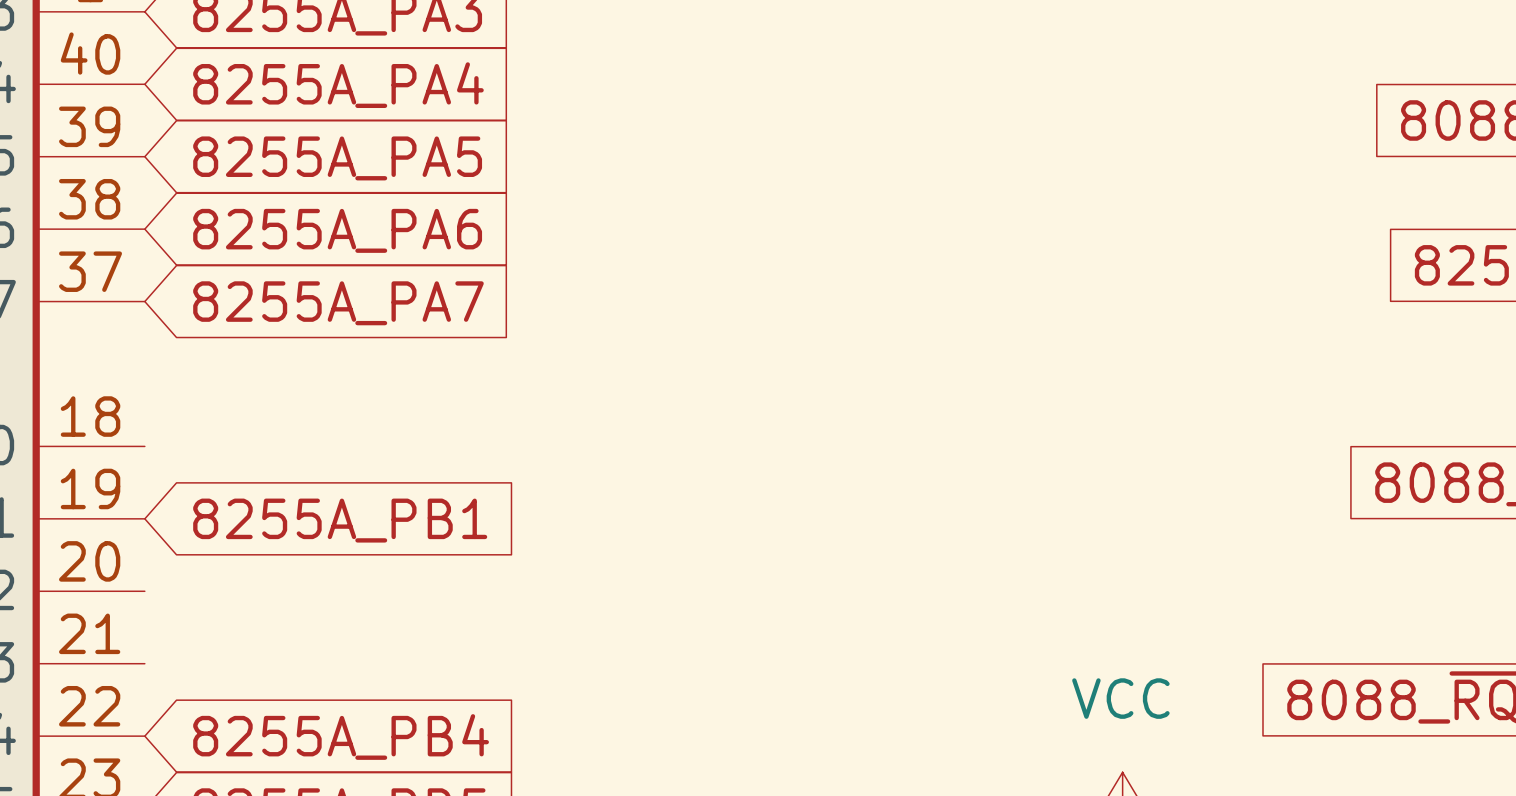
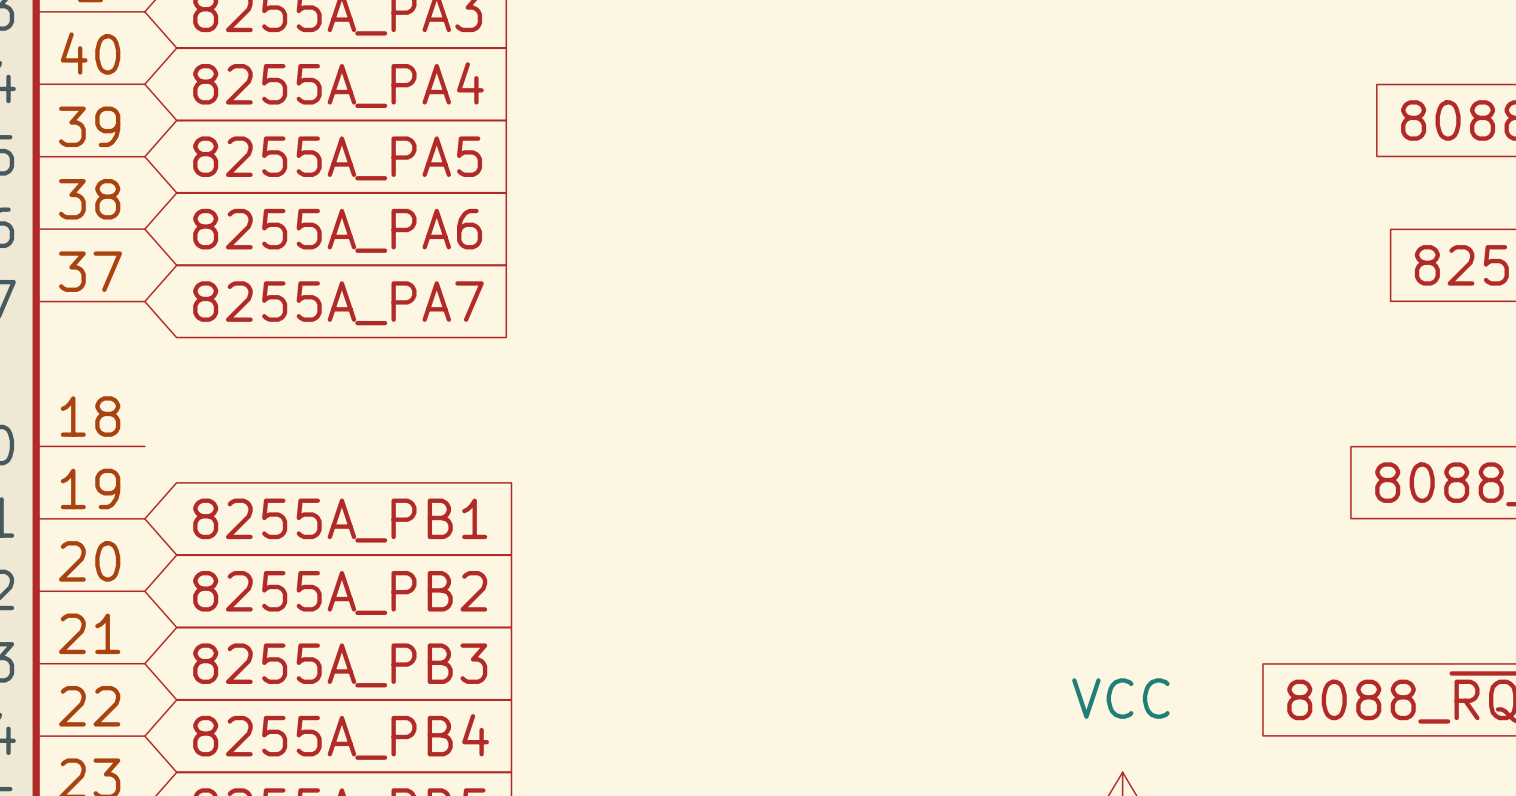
global label: none -> 8255A_PB2 (340, 593)
global label: none -> 8255A_PB3 (340, 665)

